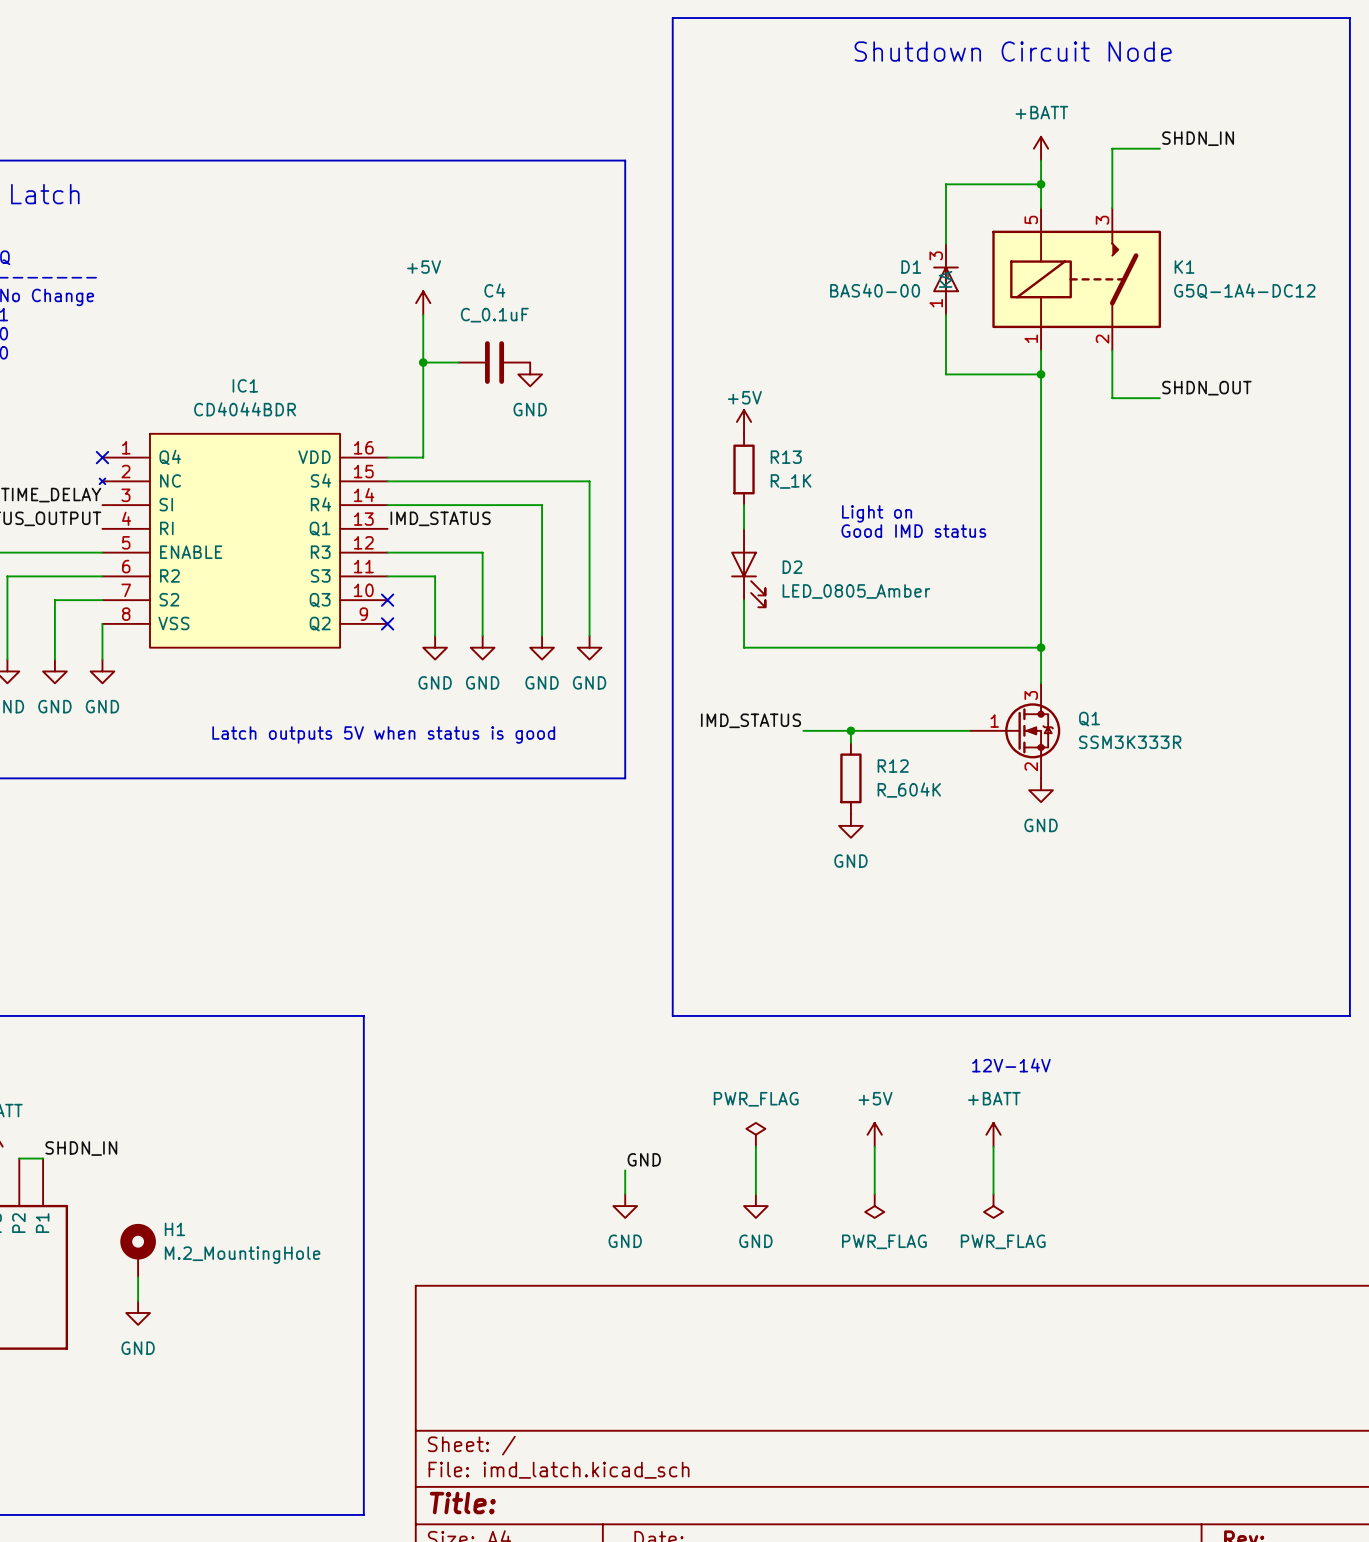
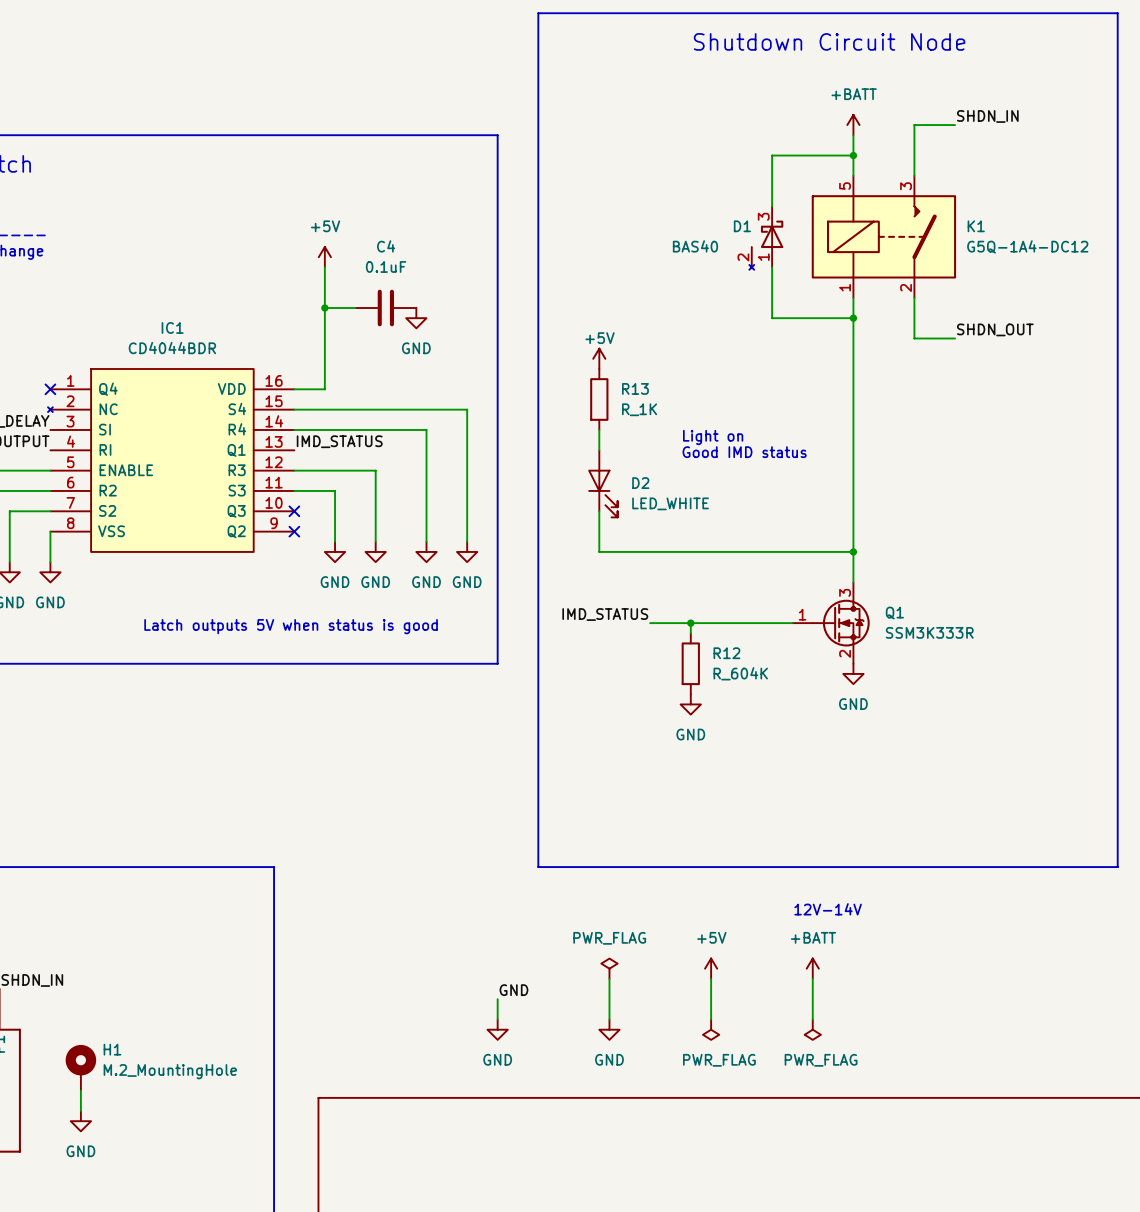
D1 symbol: [933, 243, 959, 316] -> [749, 206, 784, 270]
D1 value: BAS40-00 (875, 290) -> BAS40 (695, 246)
C4 value: C_0.1uF (494, 315) -> 0.1uF (386, 266)
D2 value: LED_0805_Amber (856, 591) -> LED_WHITE (670, 503)
Q1 symbol: [969, 683, 1061, 779] -> [792, 582, 870, 664]

